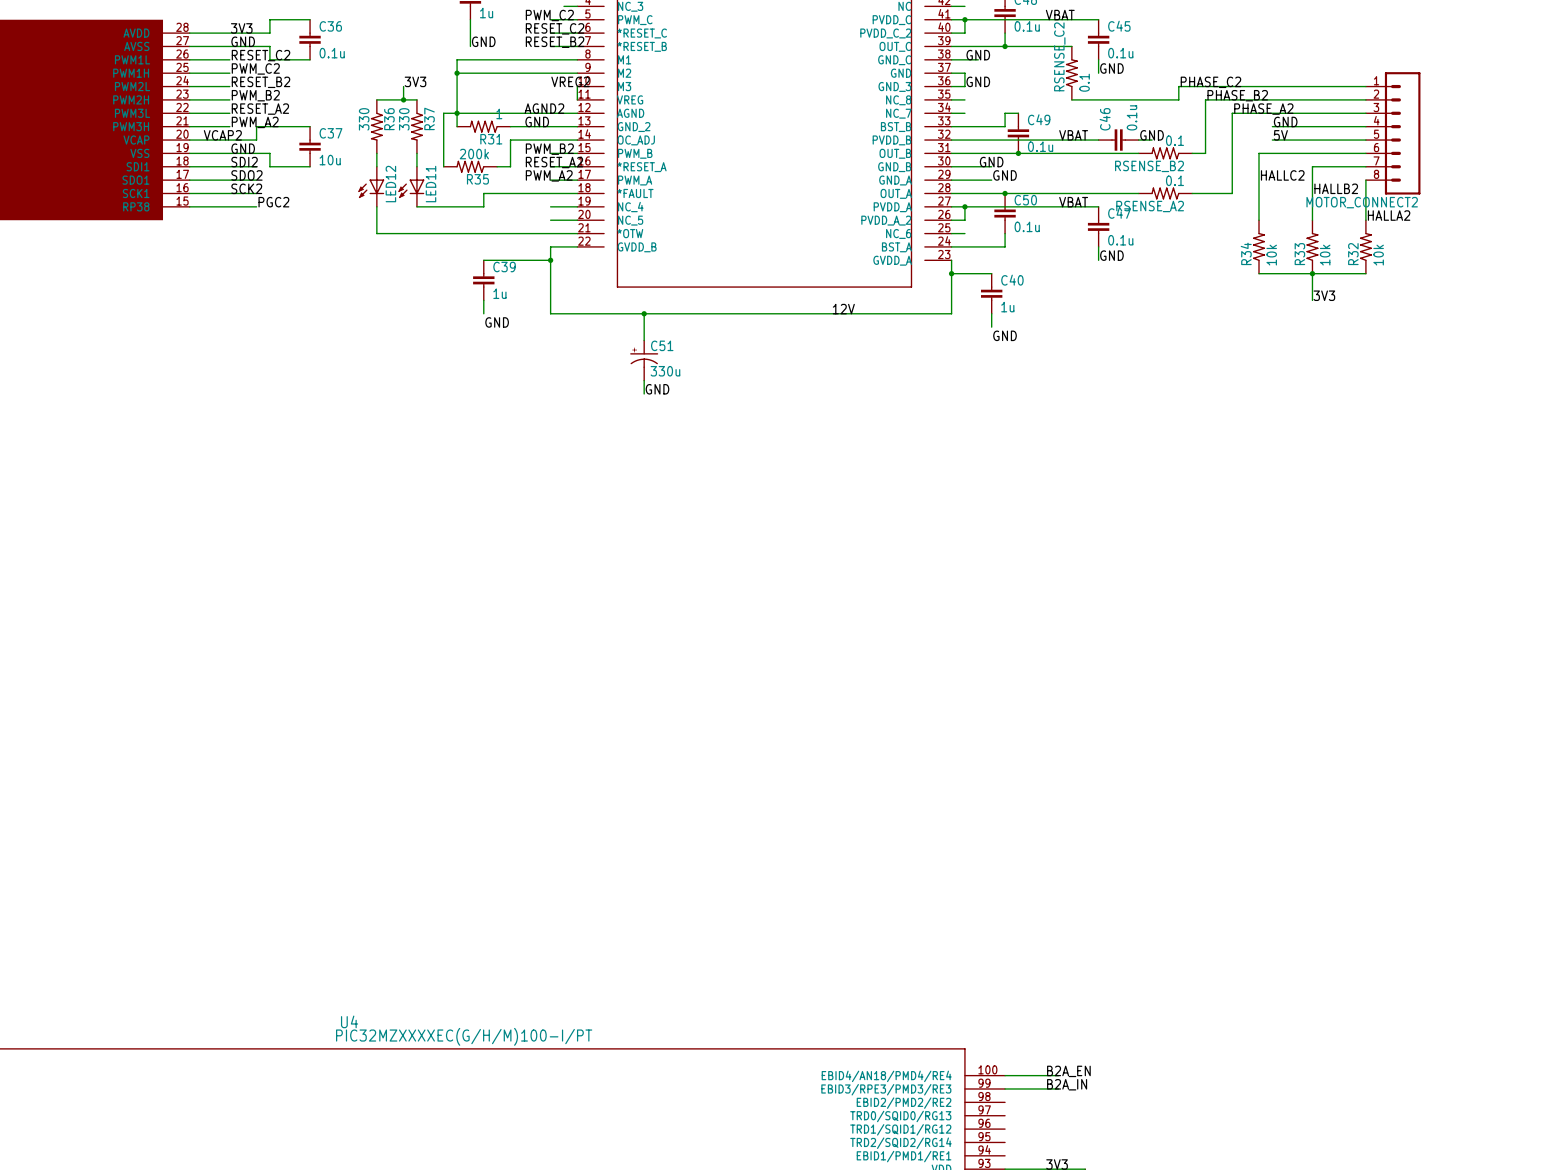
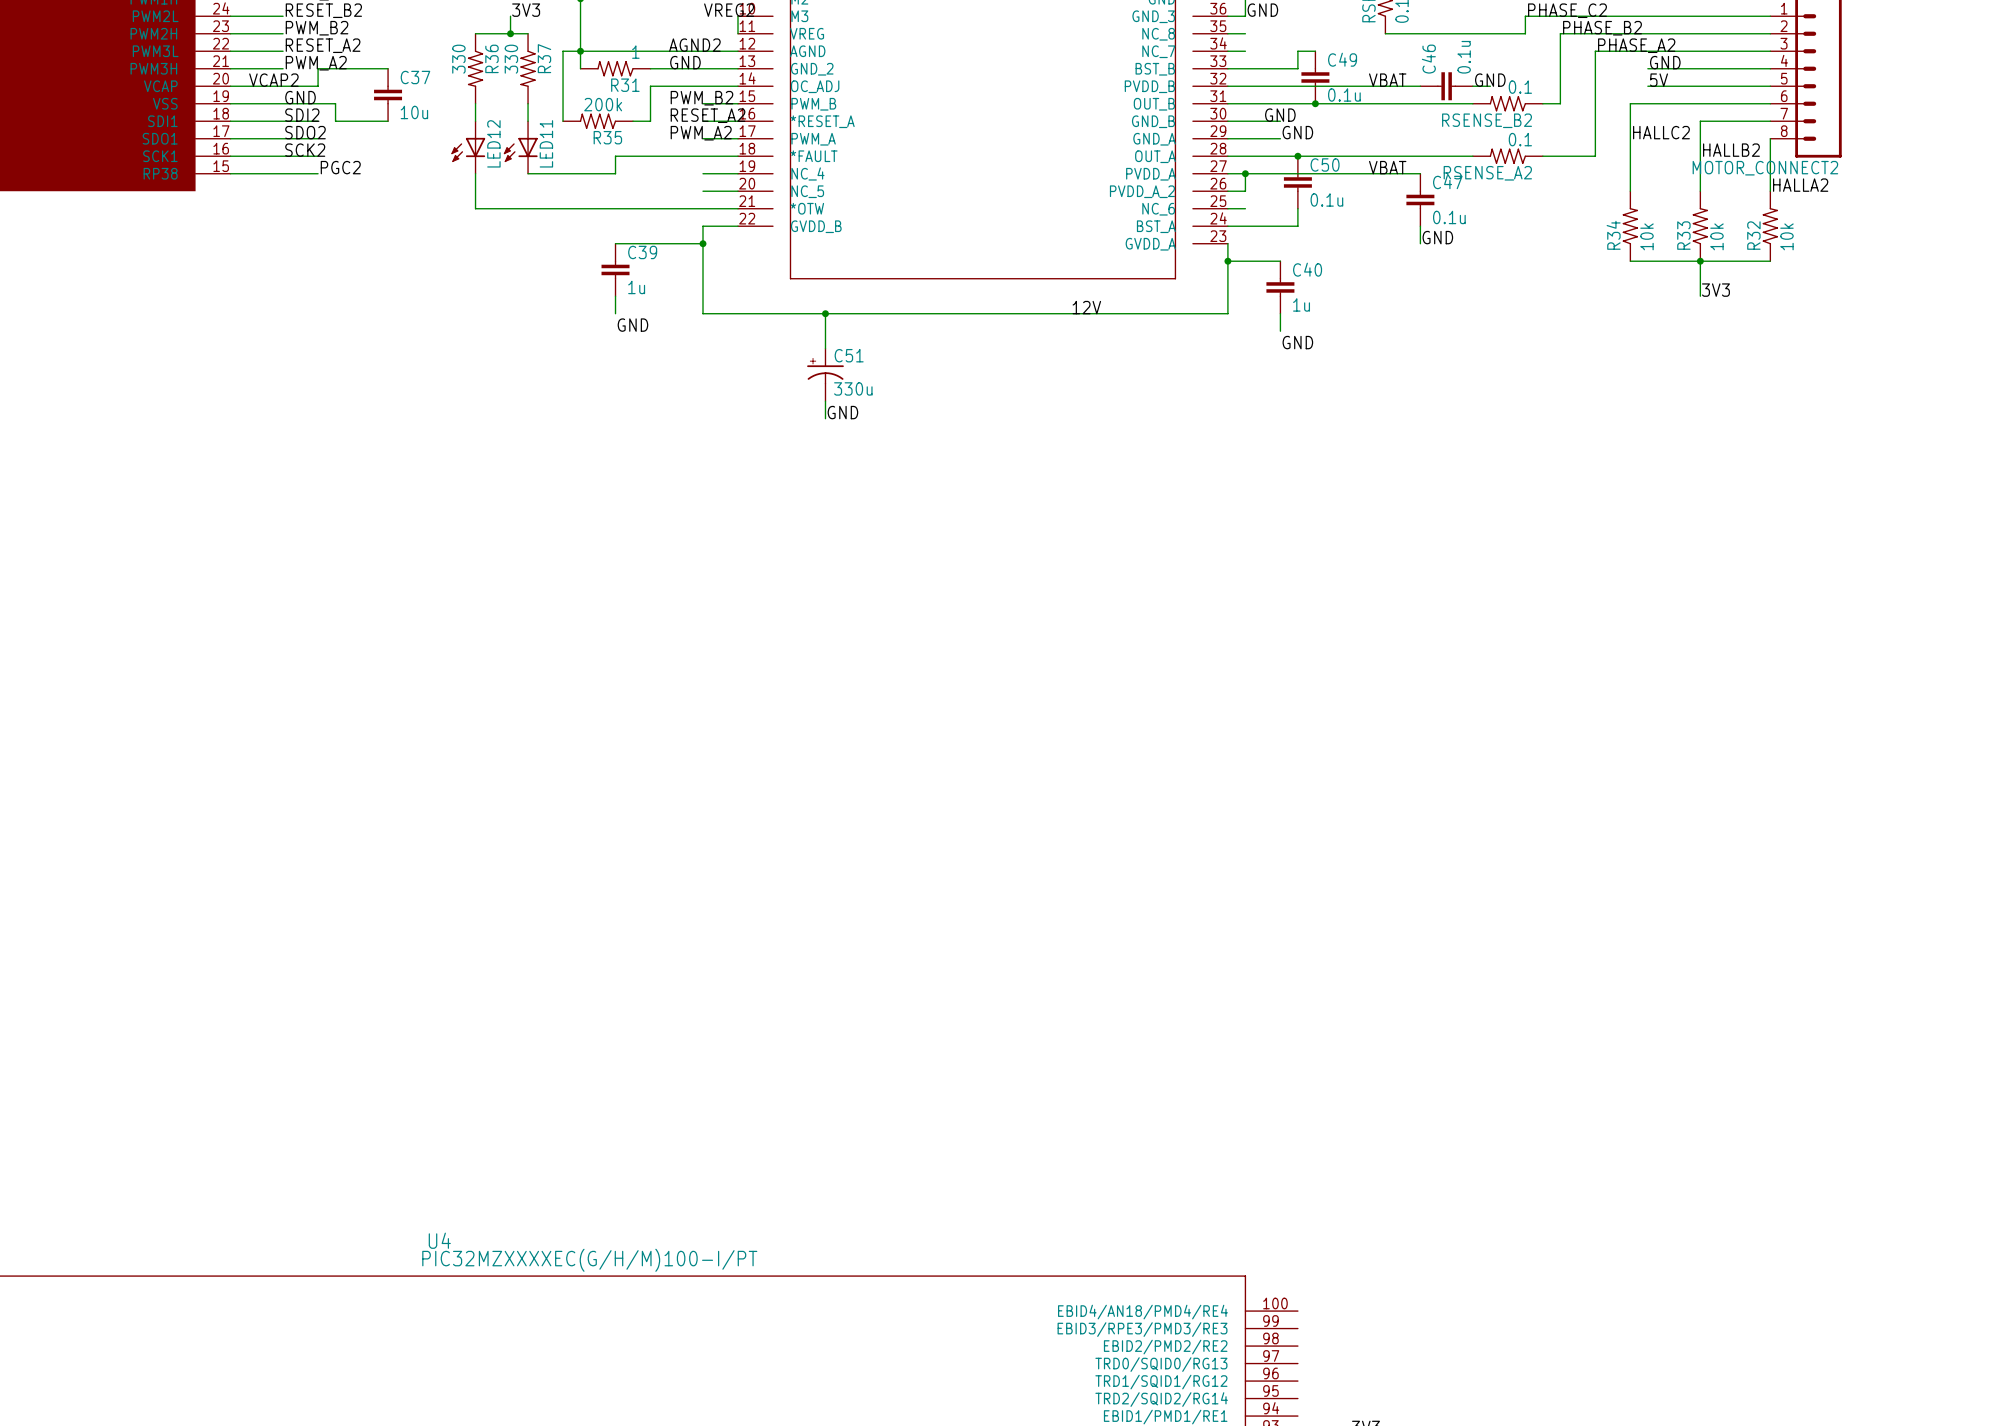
label: B2A_EN (1068, 1071) -> none
wire: (1005, 1075) (1058, 1075) -> none
label: B2A_IN (1067, 1084) -> none
wire: (1005, 1088) (1058, 1088) -> none

